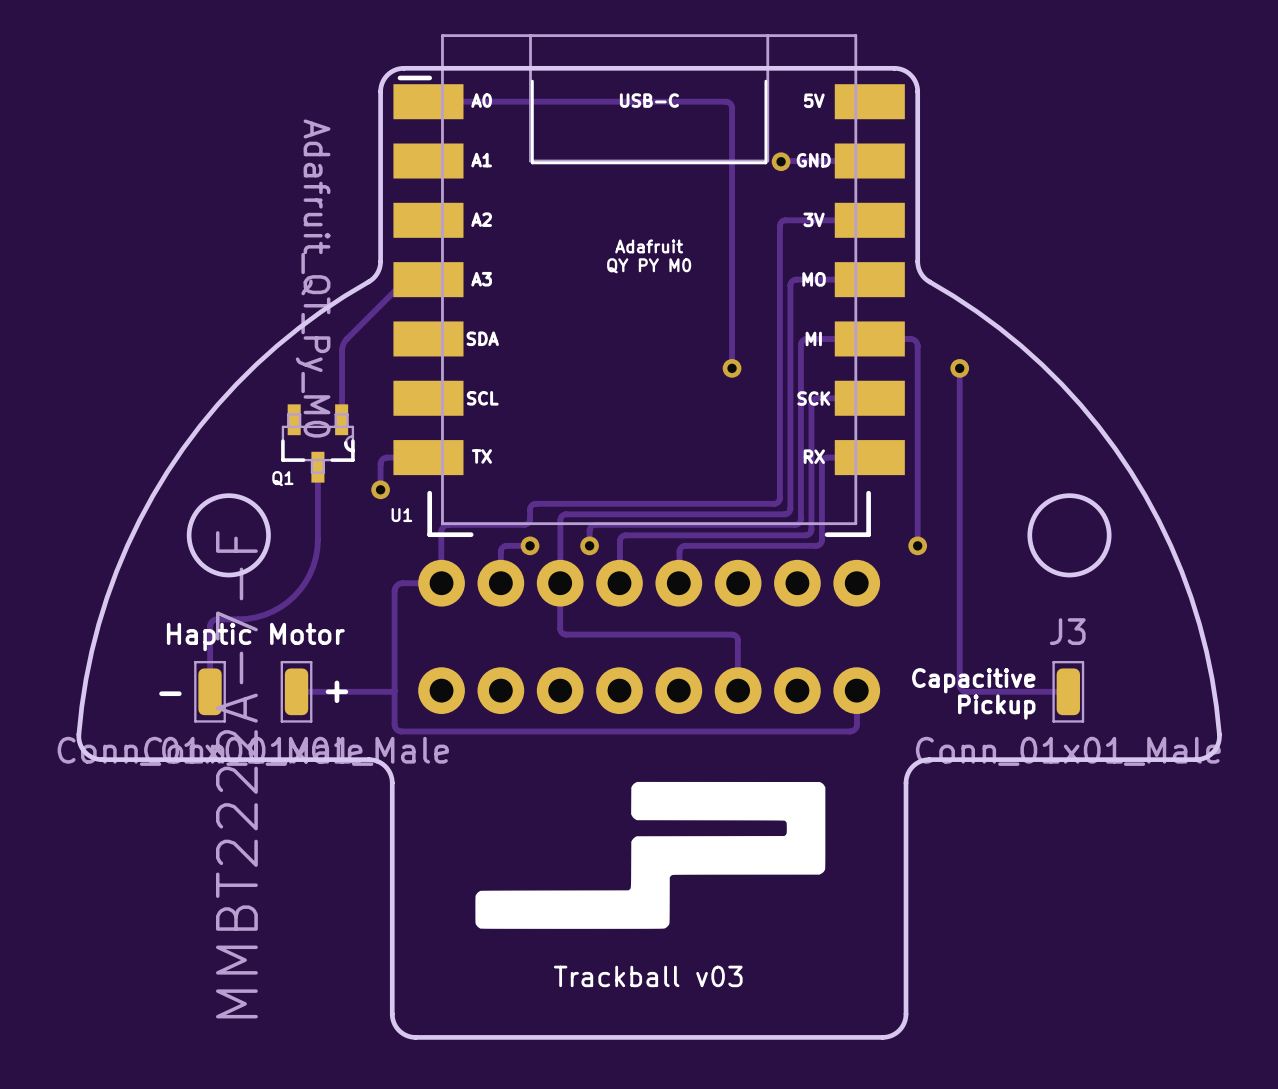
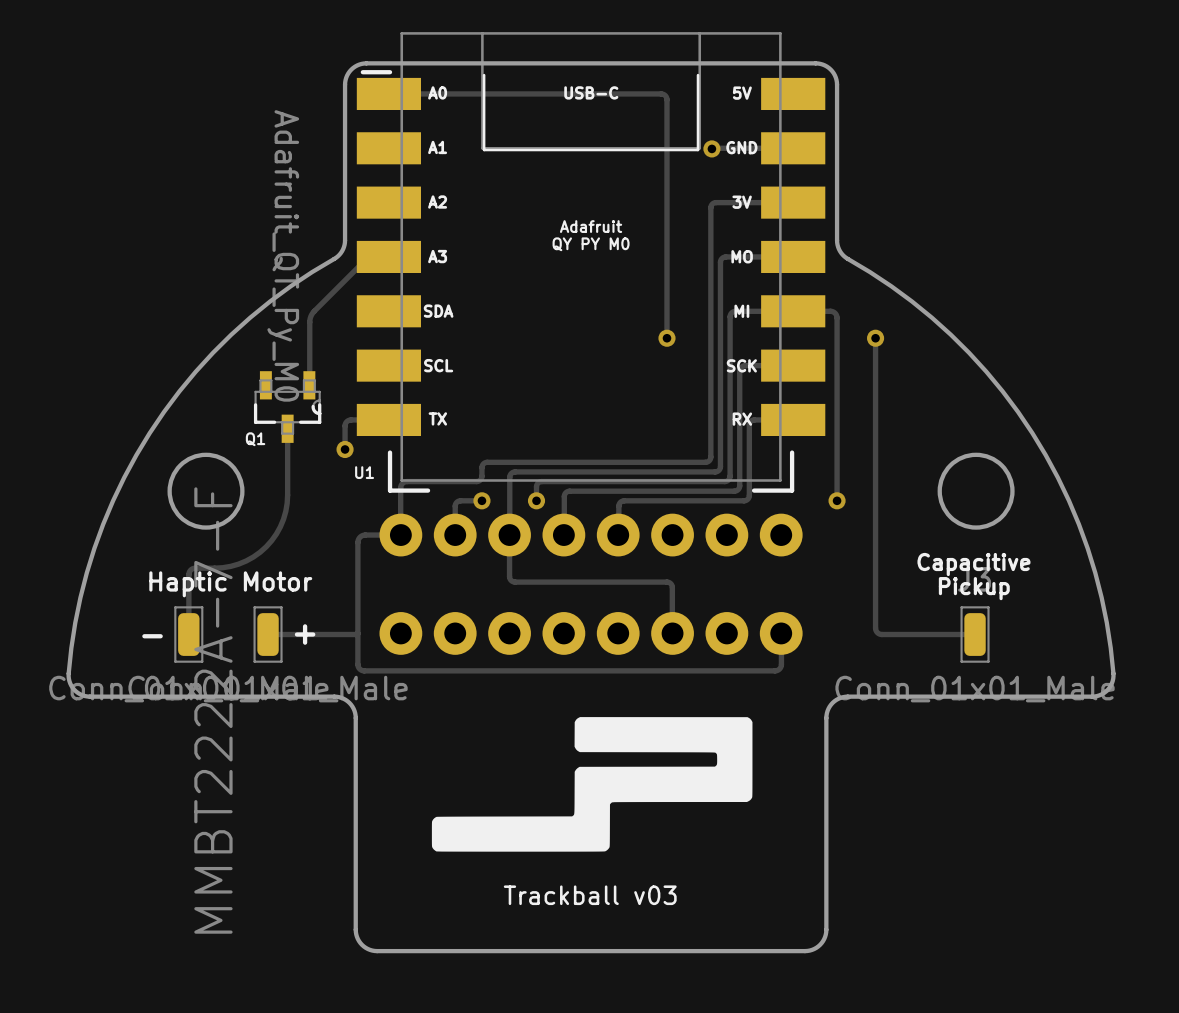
text position: Capacitive (973, 680) -> Capacitive (973, 564)
text position: Pickup (996, 707) -> Pickup (974, 588)

